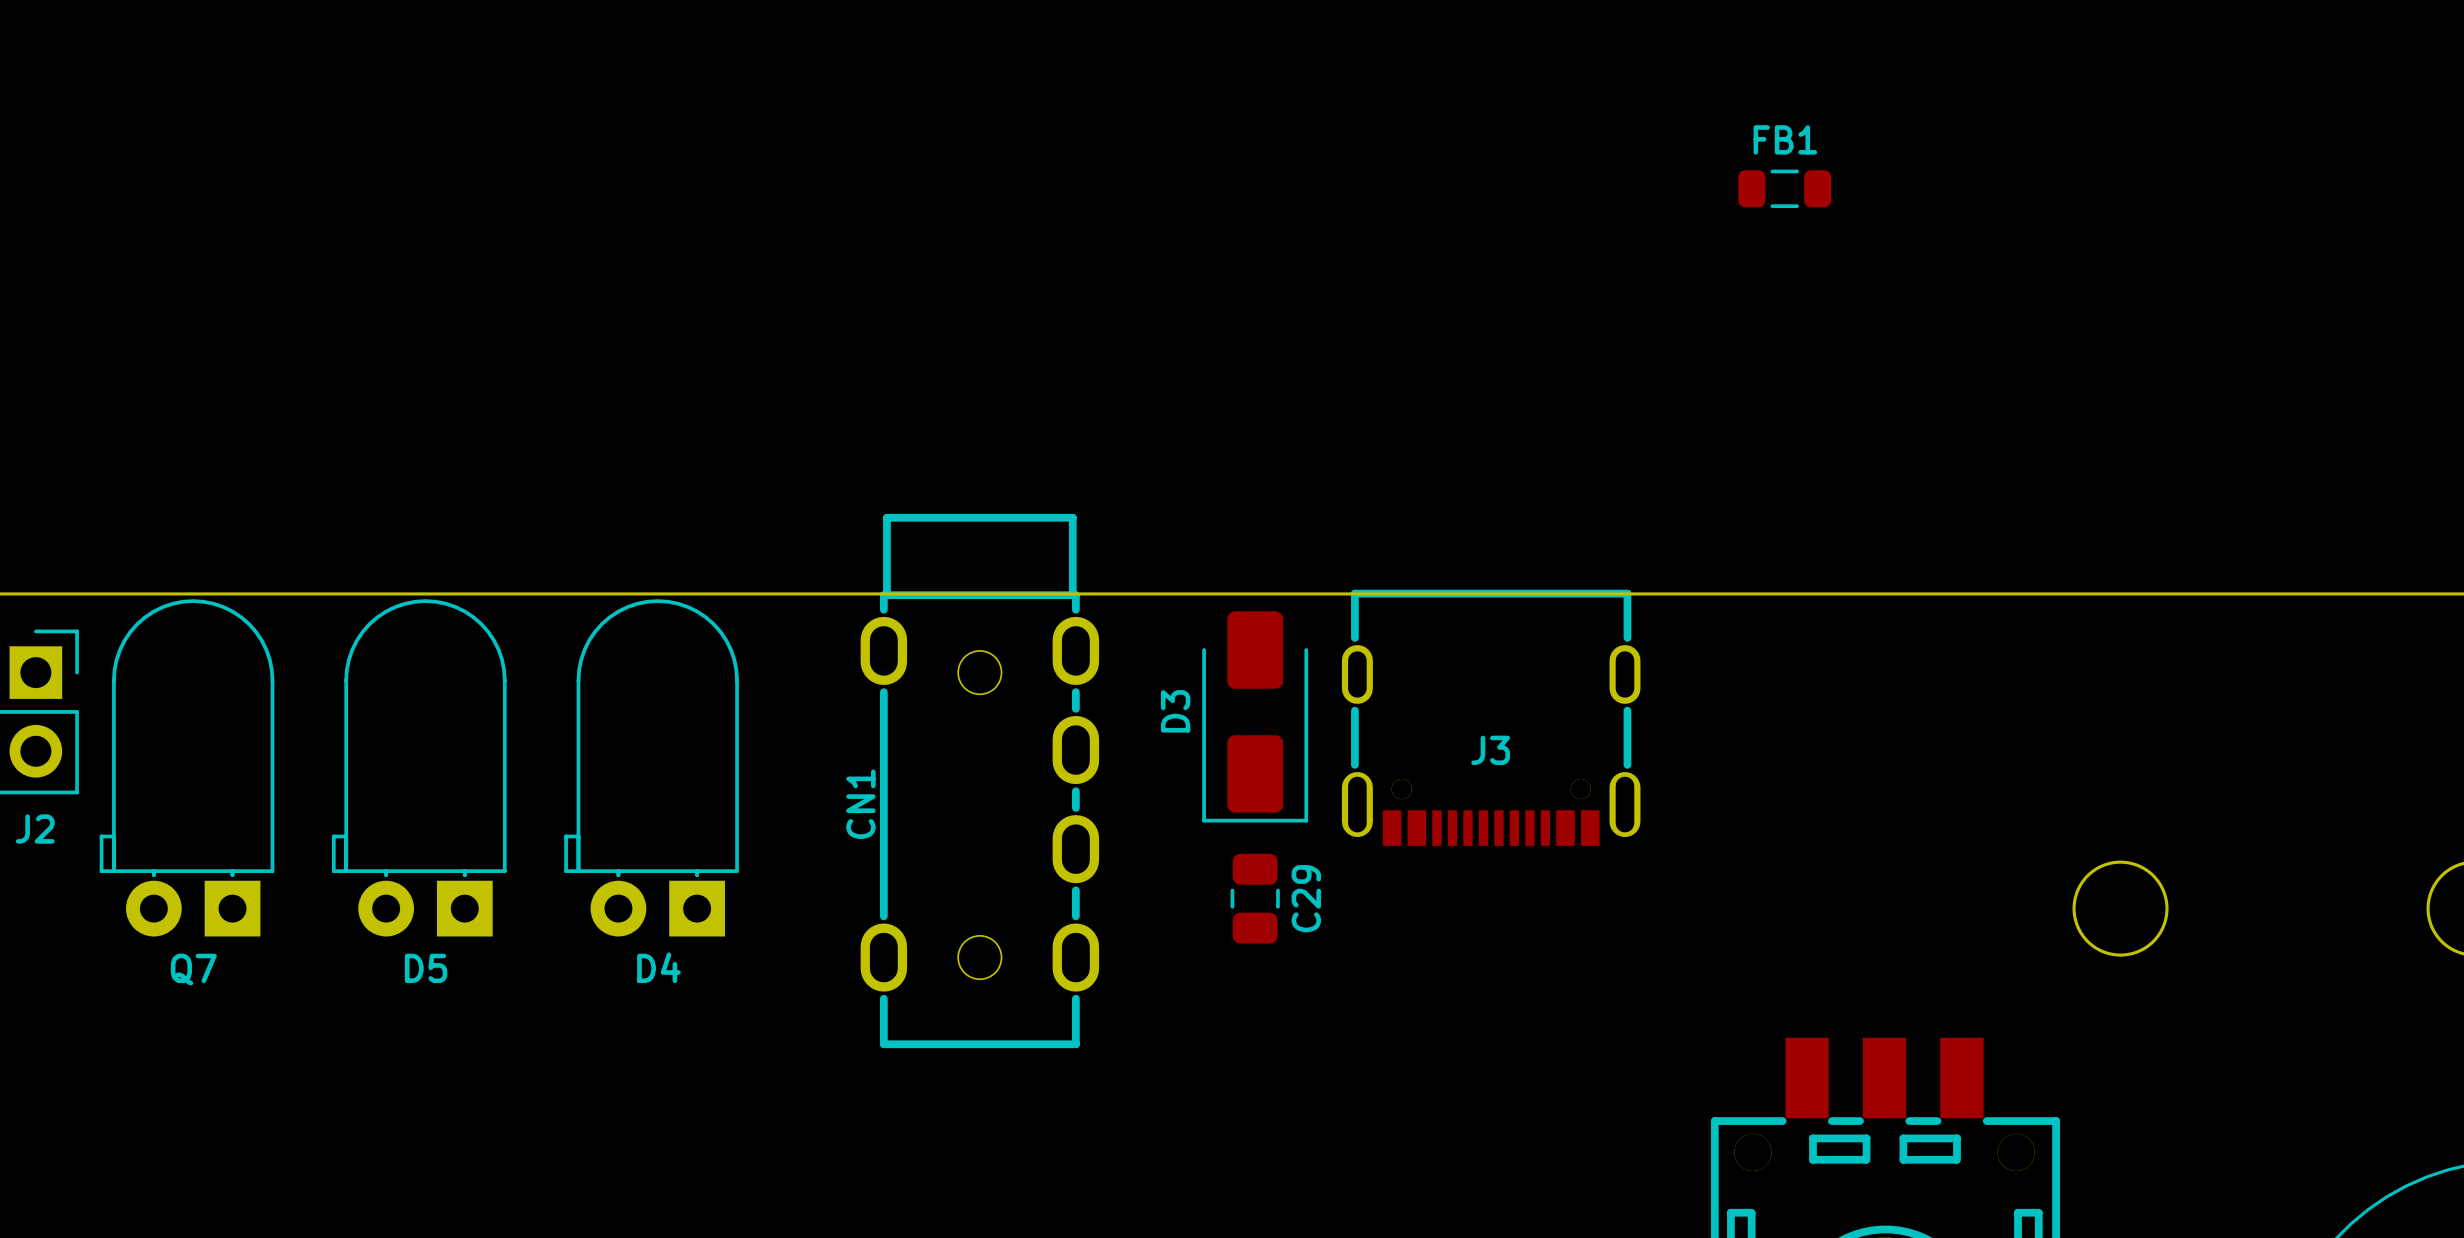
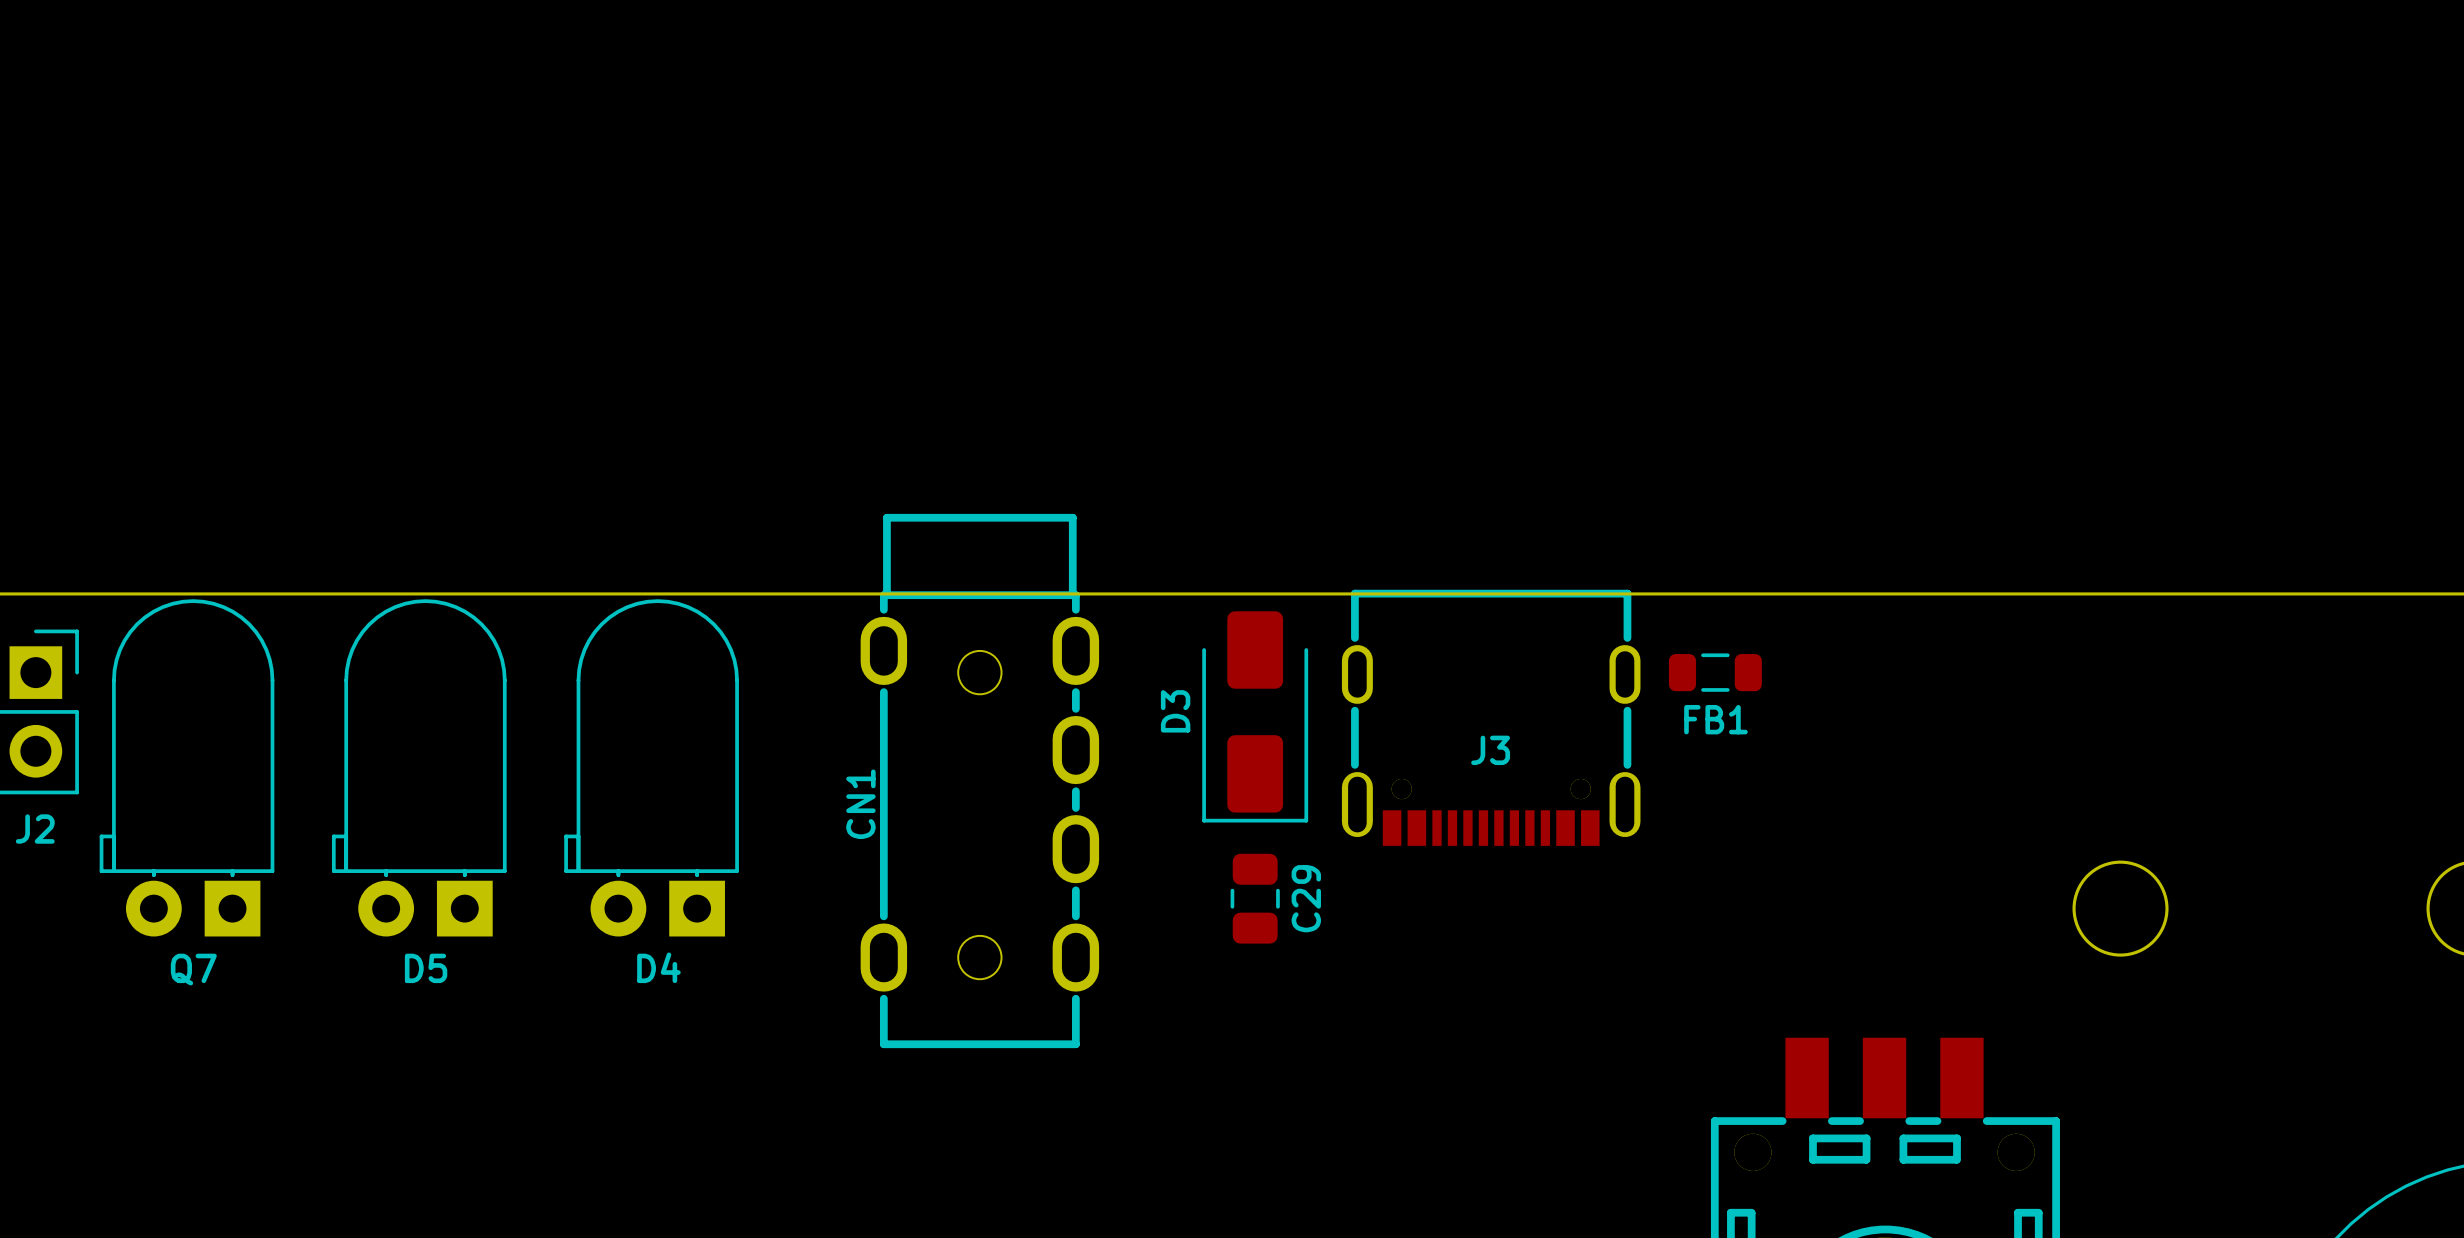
FB1 name position: FB1 (1785, 139) -> FB1 (1715, 719)
FB1 position: (1784, 188) -> (1715, 672)

